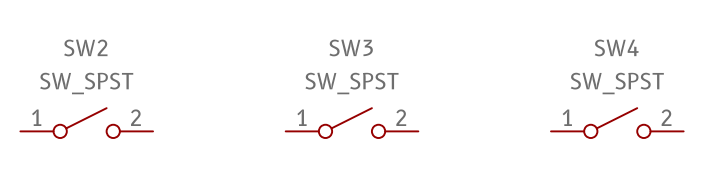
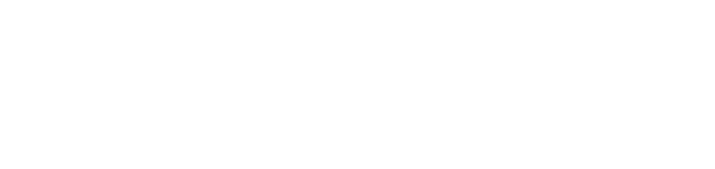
SW2: SW_SPST (86, 123) -> none
SW3: SW_SPST (352, 123) -> none
SW4: SW_SPST (617, 123) -> none

